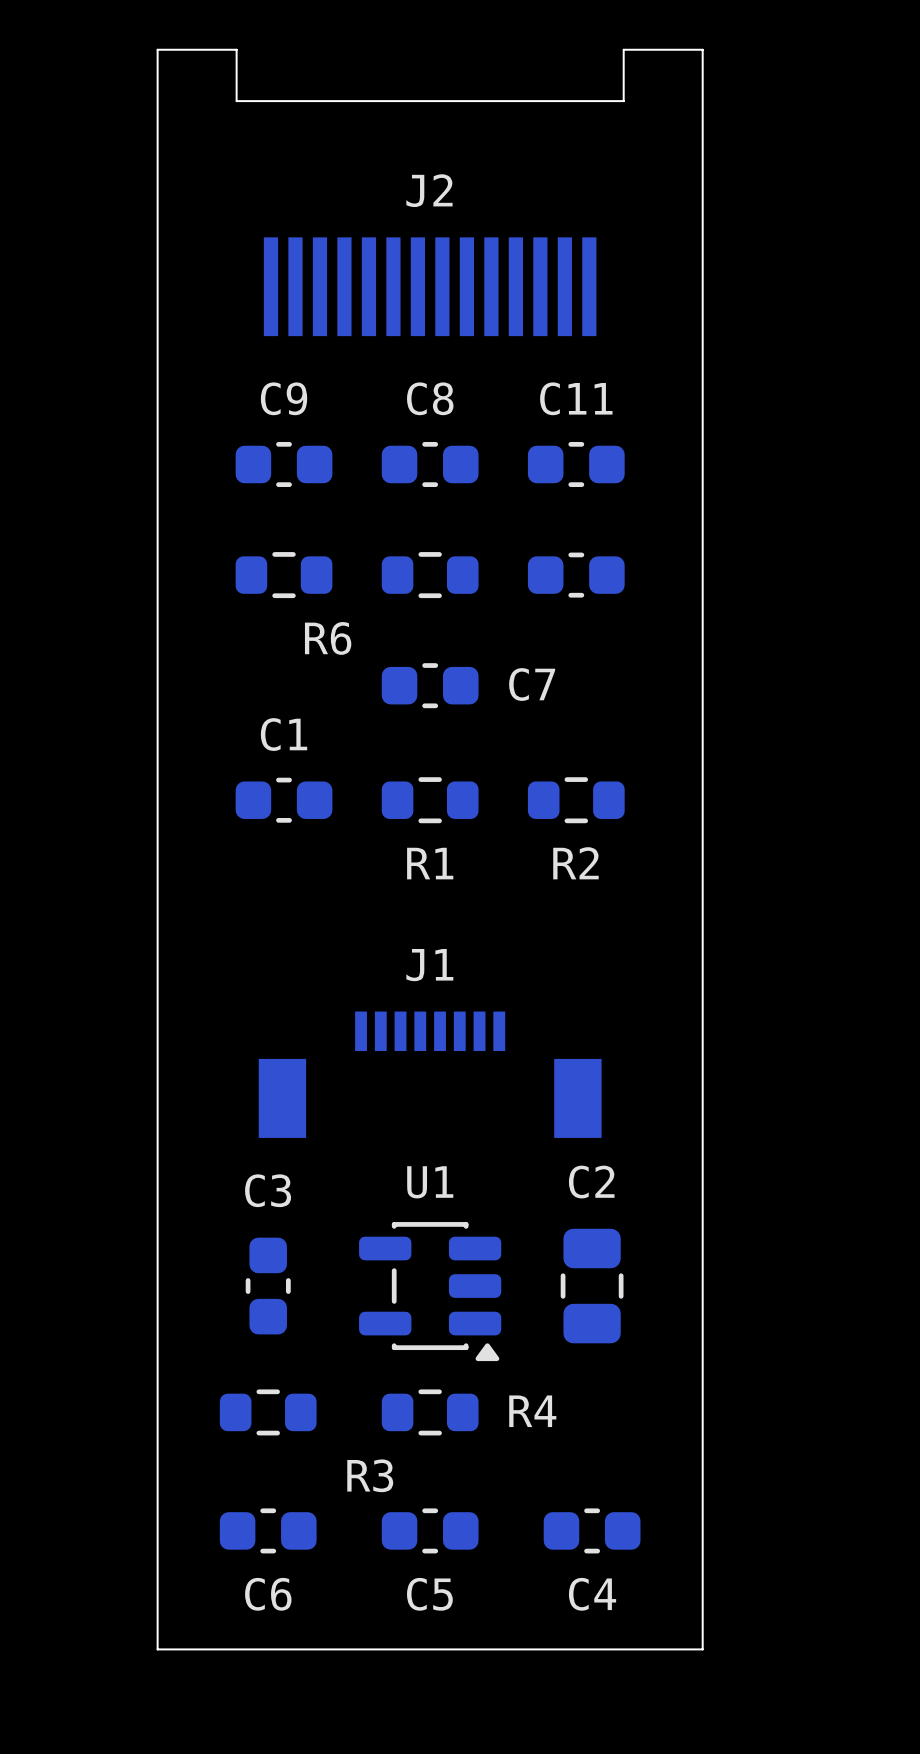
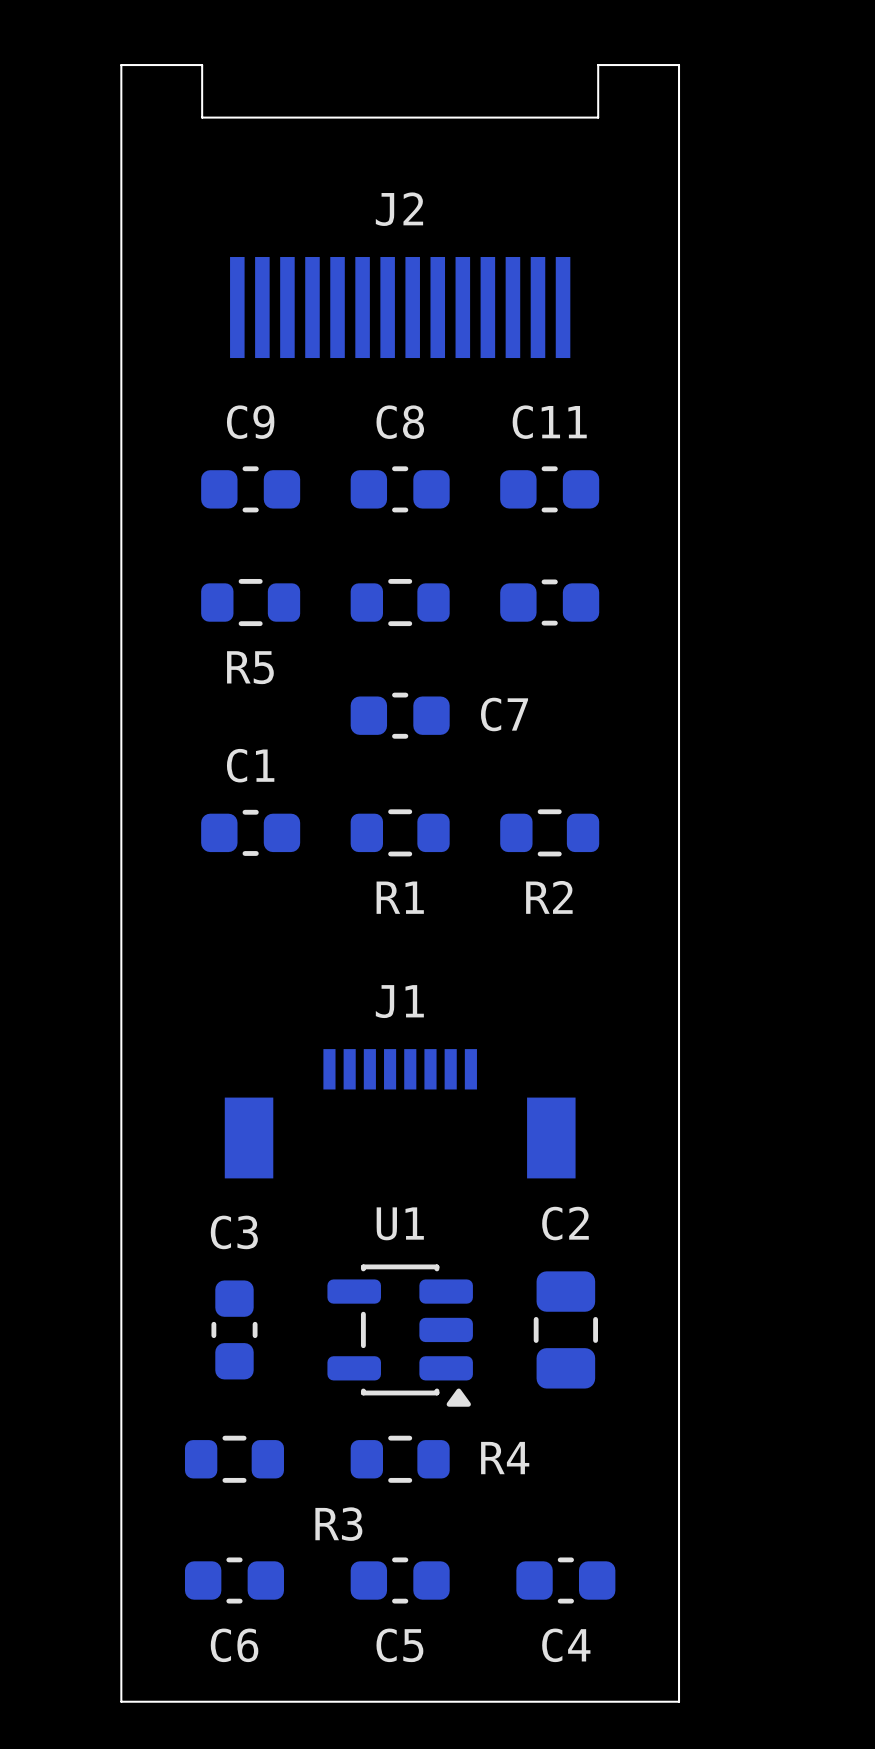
R5 name: none -> R5 (250, 667)
R6 name: R6 (328, 638) -> none

